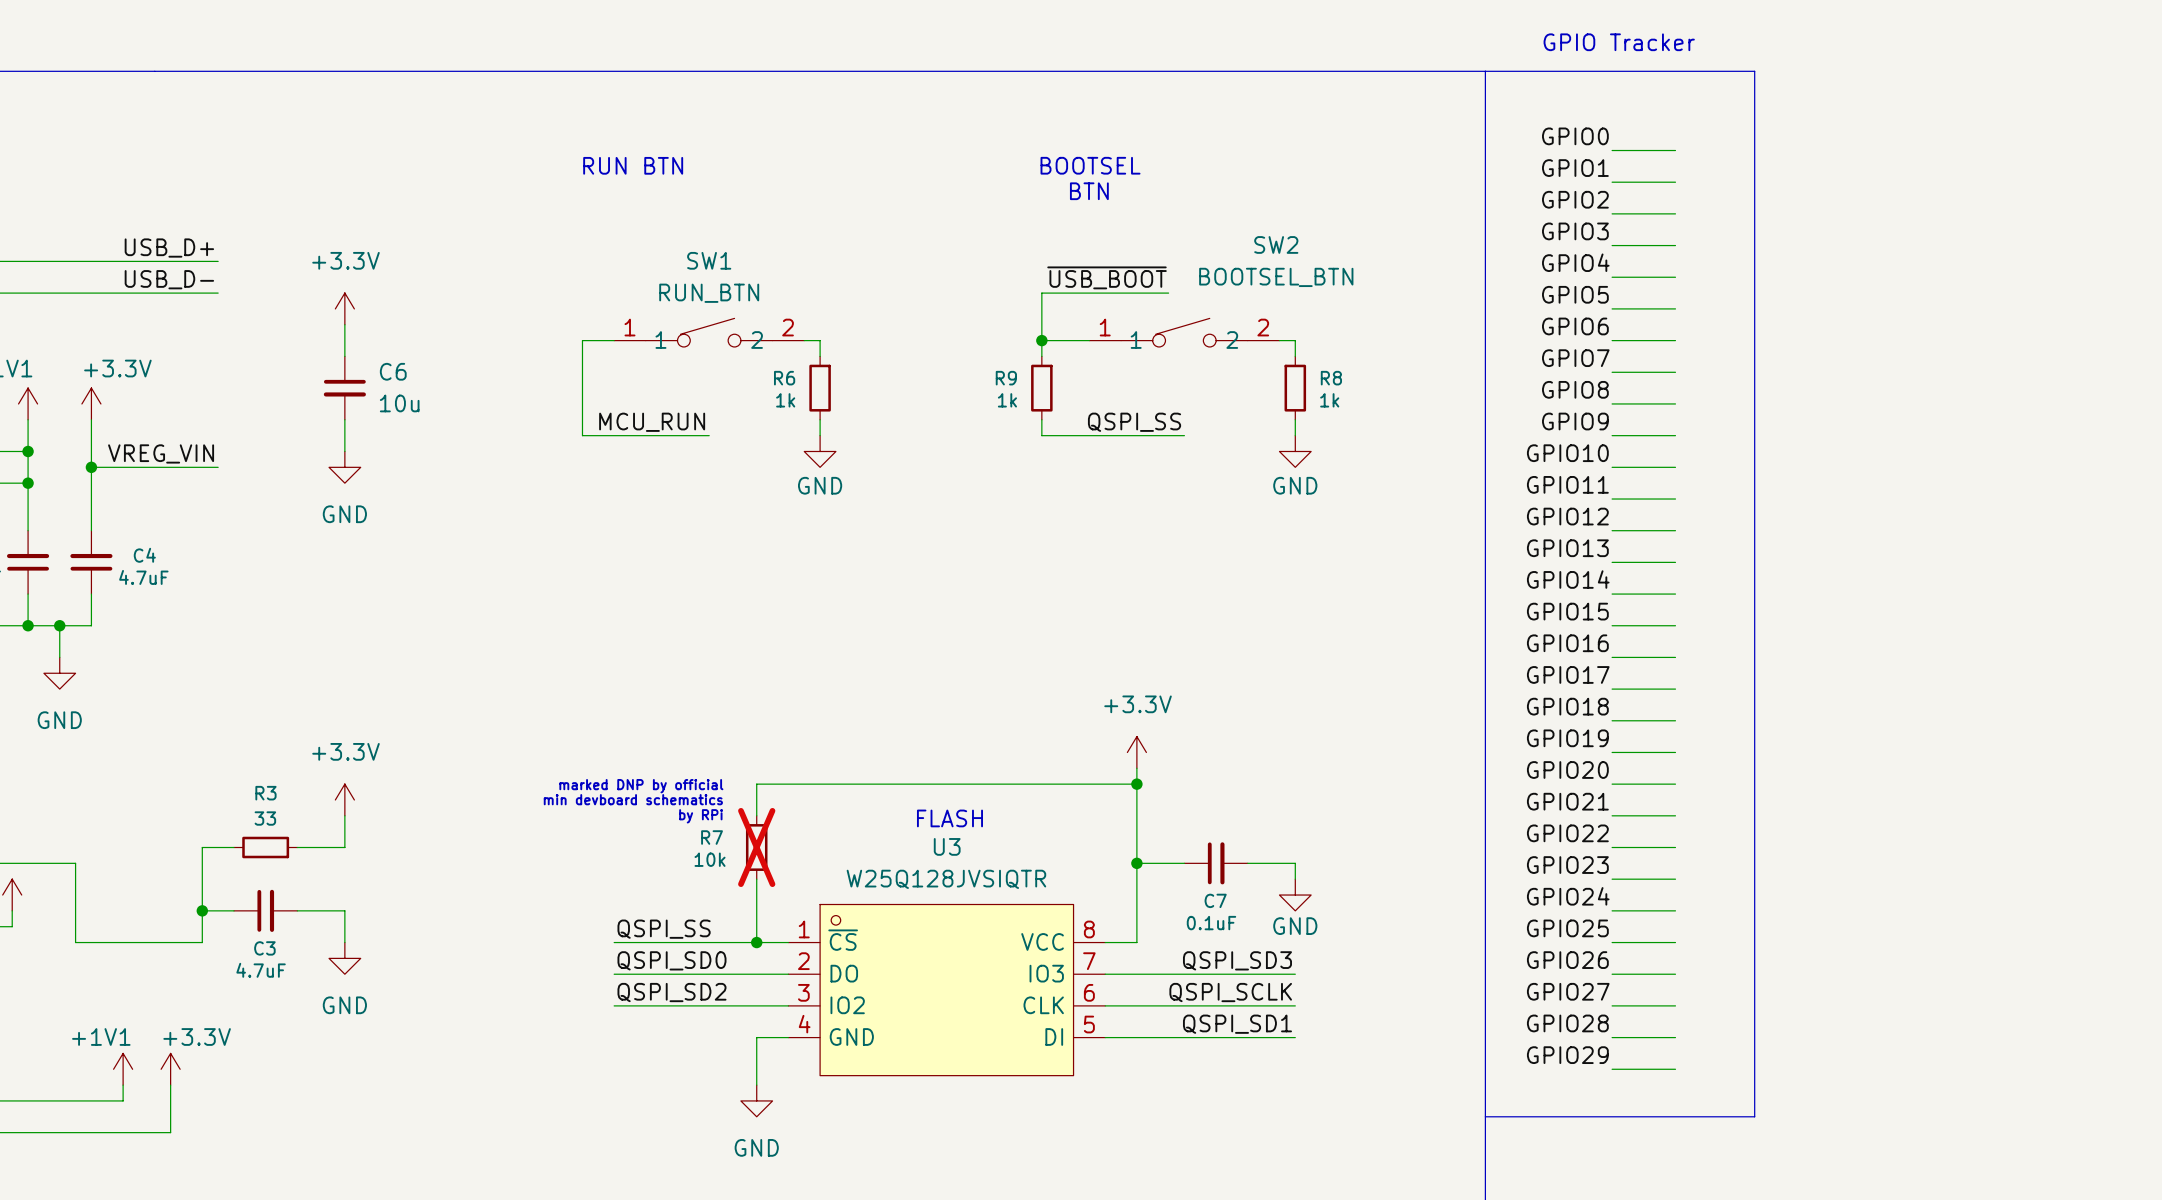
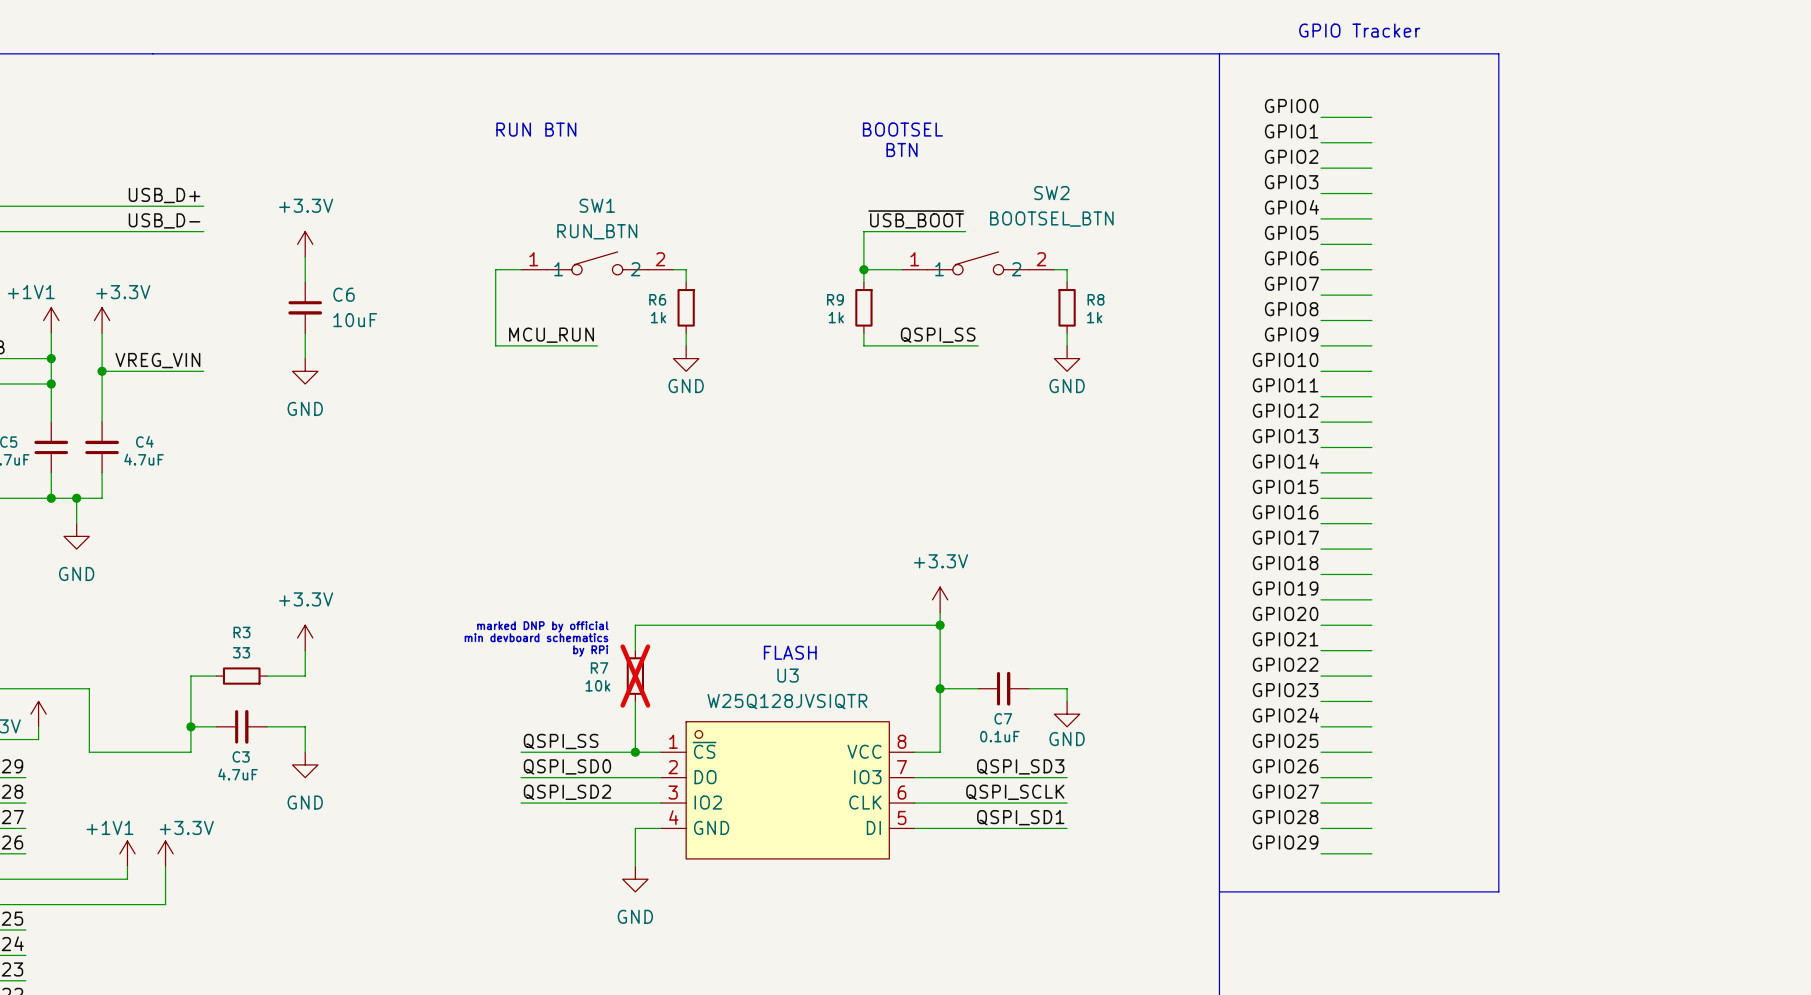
text position: GPIO Tracker (1619, 42) -> GPIO Tracker (1359, 30)
line: (1754, 71) (1754, 1116) -> (1435, 53) (1498, 53) (1498, 891) (1435, 891)
C6 value: 10u (399, 403) -> 10uF (355, 320)

